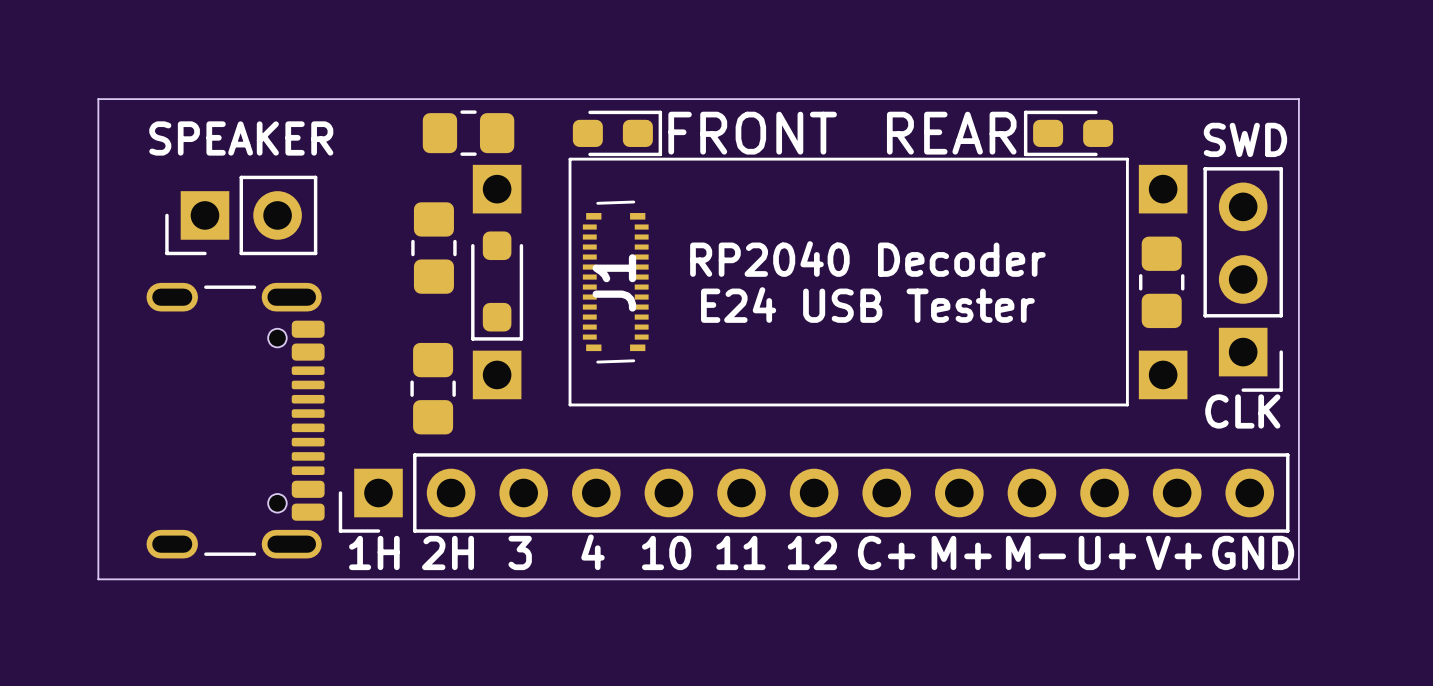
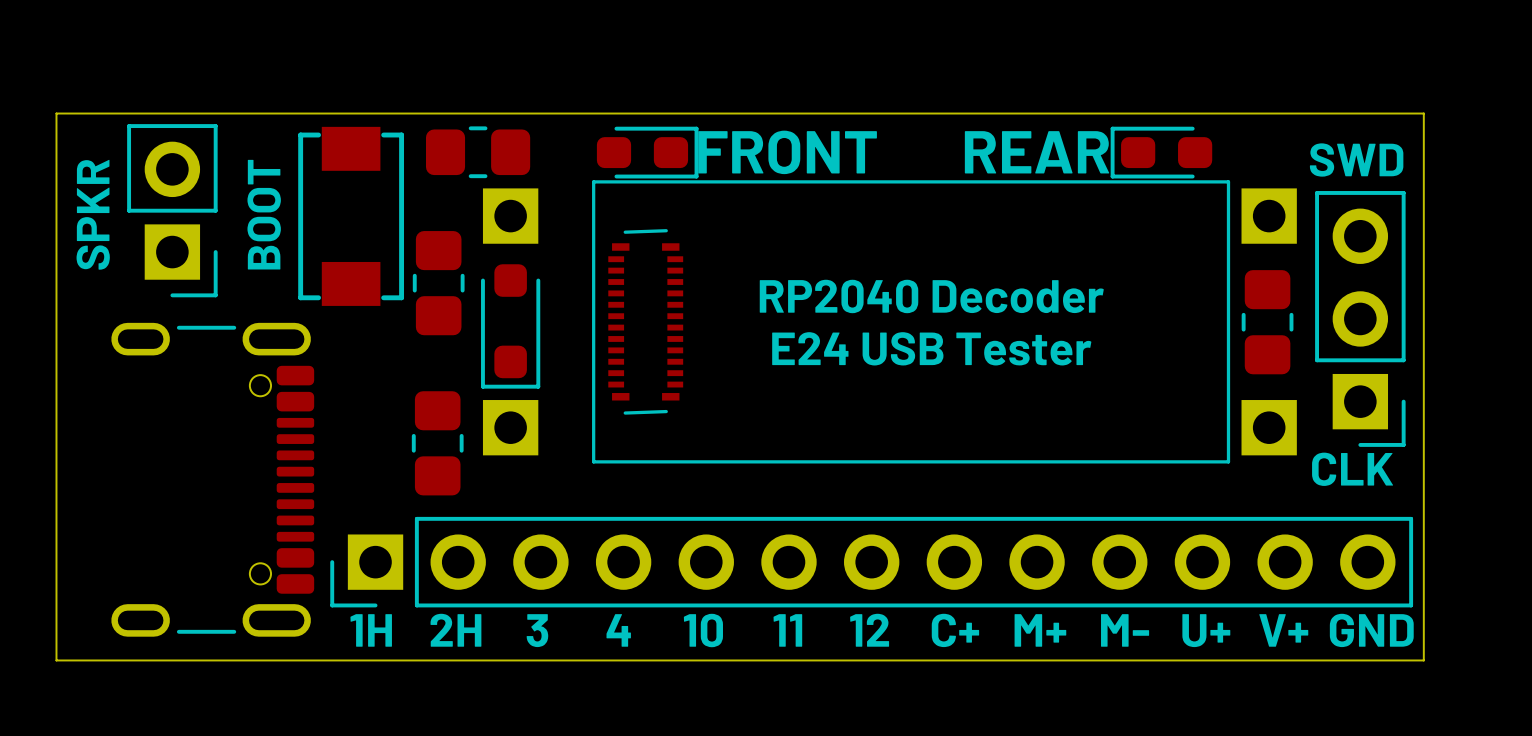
text: SPEAKER (241, 138) -> SPKR (93, 214)
text: none -> BOOT (264, 214)
part: none -> (351, 216)
part rotation: 0° (241, 215) -> 90° counterclockwise (172, 210)
J1 name: J1 (614, 282) -> none

